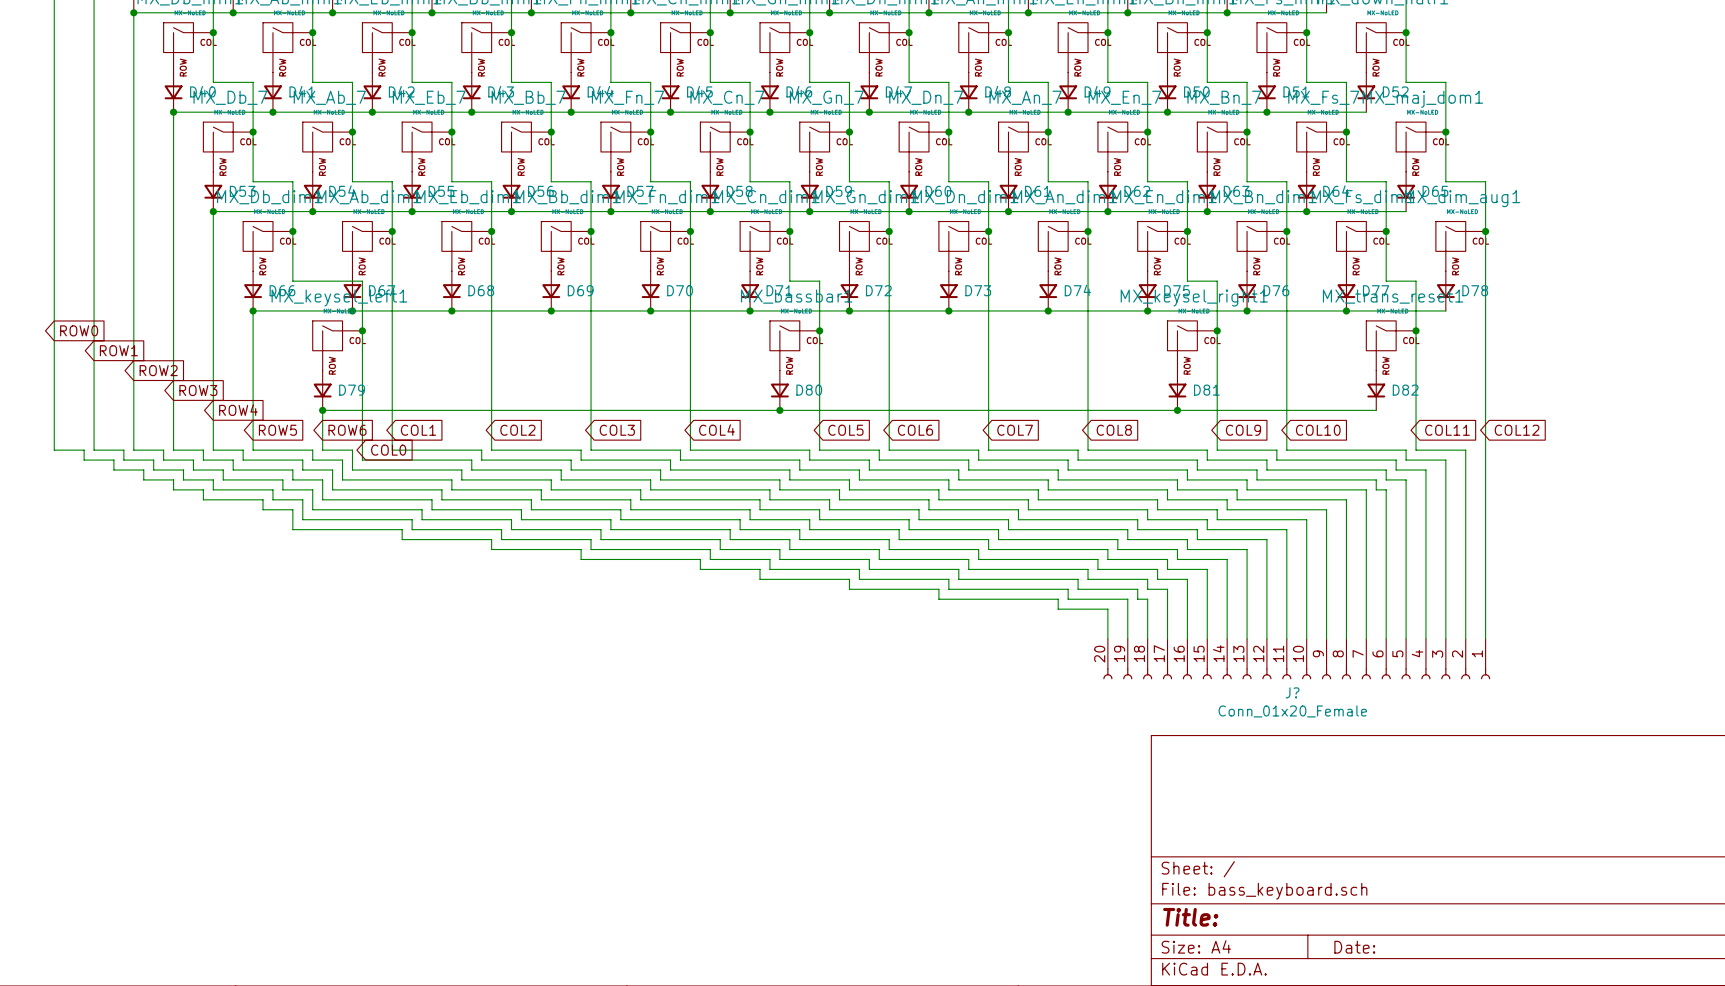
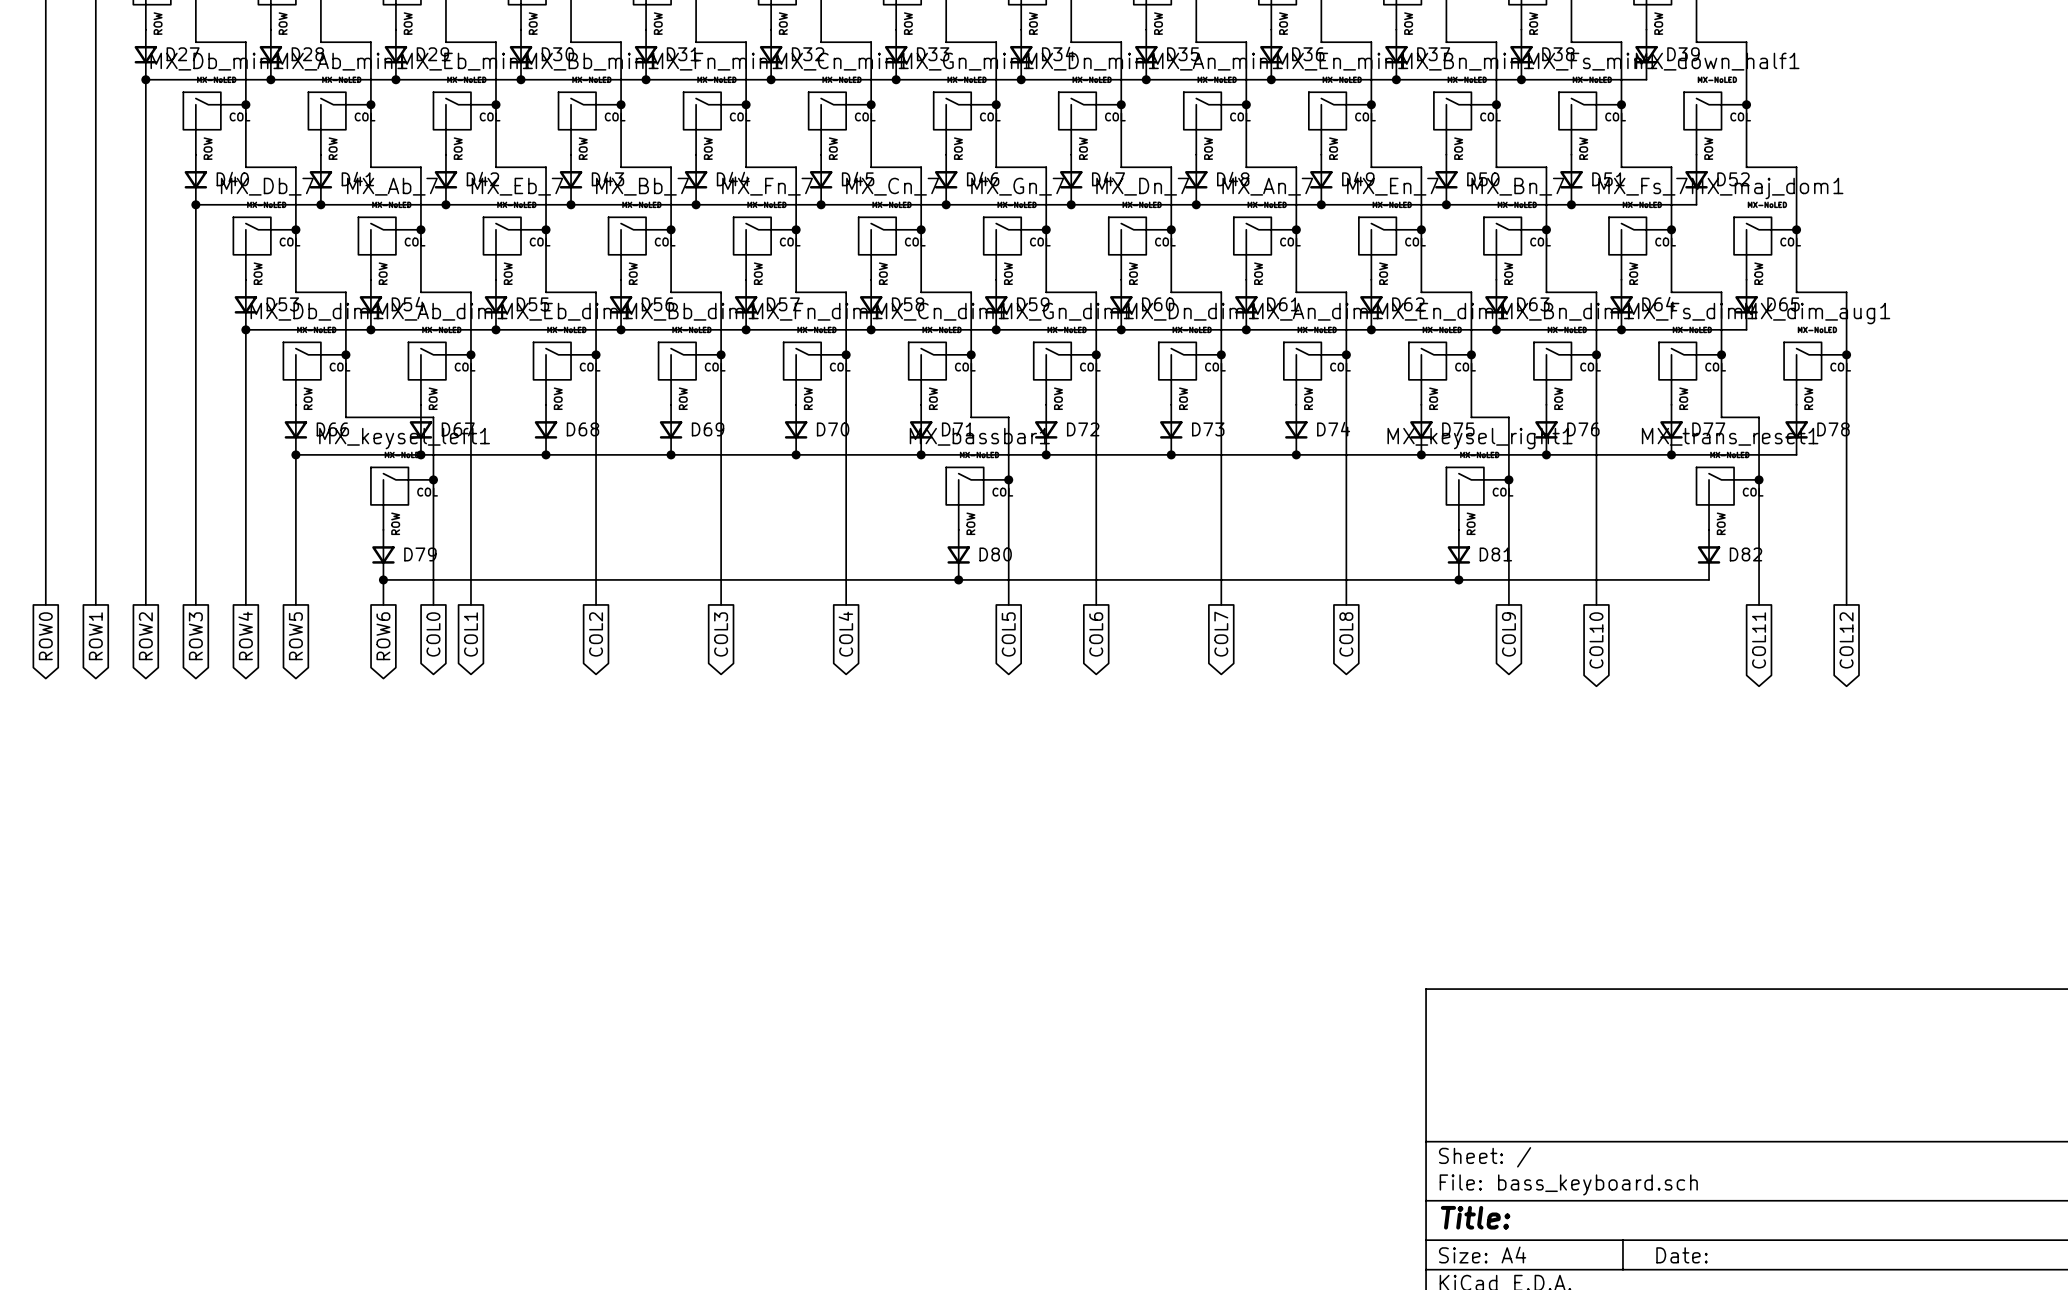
global label rotation: 0° (79, 330) -> 90° counterclockwise (45, 636)
global label position: ROW0 (79, 330) -> ROW0 (45, 636)
global label rotation: 0° (118, 350) -> 90° counterclockwise (95, 636)
global label position: ROW1 (118, 350) -> ROW1 (95, 636)
global label rotation: 0° (158, 370) -> 90° counterclockwise (145, 636)
global label position: ROW2 (158, 370) -> ROW2 (145, 636)
global label rotation: 0° (198, 390) -> 90° counterclockwise (195, 636)
global label position: ROW3 (198, 390) -> ROW3 (195, 636)
global label rotation: 0° (238, 410) -> 90° counterclockwise (245, 635)
wire: (54, 430) (54, 450) (84, 450) (84, 460) (113, 460) (113, 470) (143, 470) (143, 479) (173, 479) (173, 489) (203, 489) (203, 499) (263, 499) (263, 509) (292, 509) (292, 529) (402, 529) (402, 539) (491, 539) (491, 549) (581, 549) (581, 559) (700, 559) (700, 569) (760, 569) (760, 579) (849, 579) (849, 589) (938, 589) (938, 599) (1058, 599) (1058, 609) (1107, 609) (1107, 638) -> none
wire: (94, 430) (94, 450) (123, 450) (123, 460) (153, 460) (153, 470) (183, 470) (183, 479) (213, 479) (213, 489) (272, 489) (272, 499) (302, 499) (302, 519) (412, 519) (412, 529) (501, 529) (501, 539) (591, 539) (591, 549) (710, 549) (710, 559) (769, 559) (769, 569) (859, 569) (859, 579) (948, 579) (948, 589) (1068, 589) (1068, 599) (1127, 599) (1127, 638) -> none
wire: (133, 430) (133, 450) (163, 450) (163, 460) (193, 460) (193, 470) (223, 470) (223, 479) (282, 479) (282, 489) (312, 489) (312, 509) (422, 509) (422, 519) (511, 519) (511, 529) (600, 529) (600, 539) (720, 539) (720, 549) (779, 549) (779, 559) (869, 559) (869, 569) (958, 569) (958, 579) (1078, 579) (1078, 589) (1137, 589) (1137, 599) (1147, 599) (1147, 638) -> none
wire: (173, 430) (173, 450) (203, 450) (203, 460) (233, 460) (233, 470) (292, 470) (292, 479) (322, 479) (322, 499) (432, 499) (432, 509) (521, 509) (521, 519) (610, 519) (610, 529) (730, 529) (730, 539) (789, 539) (789, 549) (879, 549) (879, 559) (968, 559) (968, 569) (1088, 569) (1088, 579) (1147, 579) (1147, 589) (1167, 589) (1167, 638) -> none
wire: (213, 430) (213, 450) (243, 450) (243, 460) (302, 460) (302, 470) (332, 470) (332, 489) (441, 489) (441, 499) (531, 499) (531, 509) (620, 509) (620, 519) (740, 519) (740, 529) (799, 529) (799, 539) (889, 539) (889, 549) (978, 549) (978, 559) (1097, 559) (1097, 569) (1157, 569) (1157, 579) (1187, 579) (1187, 638) -> none
wire: (253, 430) (253, 450) (312, 450) (312, 460) (342, 460) (342, 479) (451, 479) (451, 489) (541, 489) (541, 499) (630, 499) (630, 509) (750, 509) (750, 519) (809, 519) (809, 529) (899, 529) (899, 539) (988, 539) (988, 549) (1107, 549) (1107, 559) (1167, 559) (1167, 569) (1207, 569) (1207, 638) -> none
global label rotation: 0° (277, 430) -> 90° counterclockwise (295, 636)
wire: (322, 430) (322, 450) (352, 450) (352, 470) (461, 470) (461, 479) (551, 479) (551, 489) (640, 489) (640, 499) (760, 499) (760, 509) (819, 509) (819, 519) (909, 519) (909, 529) (998, 529) (998, 539) (1117, 539) (1117, 549) (1177, 549) (1177, 559) (1227, 559) (1227, 638) -> none
global label rotation: 0° (347, 430) -> 90° counterclockwise (383, 636)
wire: (362, 430) (362, 460) (471, 460) (471, 470) (561, 470) (561, 479) (650, 479) (650, 489) (769, 489) (769, 499) (829, 499) (829, 509) (919, 509) (919, 519) (1008, 519) (1008, 529) (1127, 529) (1127, 539) (1187, 539) (1187, 549) (1247, 549) (1247, 638) -> none
wire: (392, 430) (392, 450) (481, 450) (481, 460) (571, 460) (571, 470) (660, 470) (660, 479) (779, 479) (779, 489) (839, 489) (839, 499) (928, 499) (928, 509) (1018, 509) (1018, 519) (1137, 519) (1137, 529) (1197, 529) (1197, 539) (1266, 539) (1266, 638) -> none
global label rotation: 0° (418, 430) -> 90° counterclockwise (470, 634)
wire: (491, 430) (491, 450) (581, 450) (581, 460) (670, 460) (670, 470) (789, 470) (789, 479) (849, 479) (849, 489) (938, 489) (938, 499) (1028, 499) (1028, 509) (1147, 509) (1147, 519) (1207, 519) (1207, 529) (1286, 529) (1286, 638) -> none
global label rotation: 0° (517, 430) -> 90° counterclockwise (596, 634)
wire: (591, 430) (591, 450) (680, 450) (680, 460) (799, 460) (799, 470) (859, 470) (859, 479) (948, 479) (948, 489) (1038, 489) (1038, 499) (1157, 499) (1157, 509) (1217, 509) (1217, 519) (1306, 519) (1306, 638) -> none
global label rotation: 0° (617, 430) -> 90° counterclockwise (721, 634)
wire: (690, 430) (690, 450) (809, 450) (809, 460) (869, 460) (869, 470) (958, 470) (958, 479) (1048, 479) (1048, 489) (1167, 489) (1167, 499) (1227, 499) (1227, 509) (1326, 509) (1326, 638) -> none
global label rotation: 0° (716, 430) -> 90° counterclockwise (845, 634)
wire: (819, 430) (819, 450) (879, 450) (879, 460) (968, 460) (968, 470) (1058, 470) (1058, 479) (1177, 479) (1177, 489) (1237, 489) (1237, 499) (1346, 499) (1346, 638) -> none
global label rotation: 0° (845, 430) -> 90° counterclockwise (1008, 634)
wire: (889, 430) (889, 450) (978, 450) (978, 460) (1068, 460) (1068, 470) (1187, 470) (1187, 479) (1247, 479) (1247, 489) (1366, 489) (1366, 638) -> none
global label rotation: 0° (915, 430) -> 90° counterclockwise (1096, 634)
wire: (988, 430) (988, 450) (1078, 450) (1078, 460) (1197, 460) (1197, 470) (1256, 470) (1256, 479) (1376, 479) (1376, 489) (1386, 489) (1386, 638) -> none
global label rotation: 0° (1015, 430) -> 90° counterclockwise (1221, 634)
wire: (1088, 430) (1088, 450) (1207, 450) (1207, 460) (1266, 460) (1266, 470) (1386, 470) (1386, 479) (1406, 479) (1406, 638) -> none
global label rotation: 0° (1114, 430) -> 90° counterclockwise (1346, 634)
wire: (1217, 430) (1217, 450) (1276, 450) (1276, 460) (1396, 460) (1396, 470) (1425, 470) (1425, 638) -> none
global label rotation: 0° (1243, 430) -> 90° counterclockwise (1508, 634)
wire: (1286, 430) (1286, 450) (1406, 450) (1406, 460) (1445, 460) (1445, 638) -> none
global label rotation: 0° (1318, 430) -> 90° counterclockwise (1596, 640)
wire: (1416, 430) (1416, 450) (1465, 450) (1465, 638) -> none
global label rotation: 0° (1447, 430) -> 90° counterclockwise (1759, 640)
wire: (1485, 430) (1485, 638) -> none
global label rotation: 0° (1517, 430) -> 90° counterclockwise (1846, 640)
global label rotation: 0° (388, 450) -> 90° counterclockwise (433, 634)
J?: Conn_01x20_Female (1296, 659) -> none

